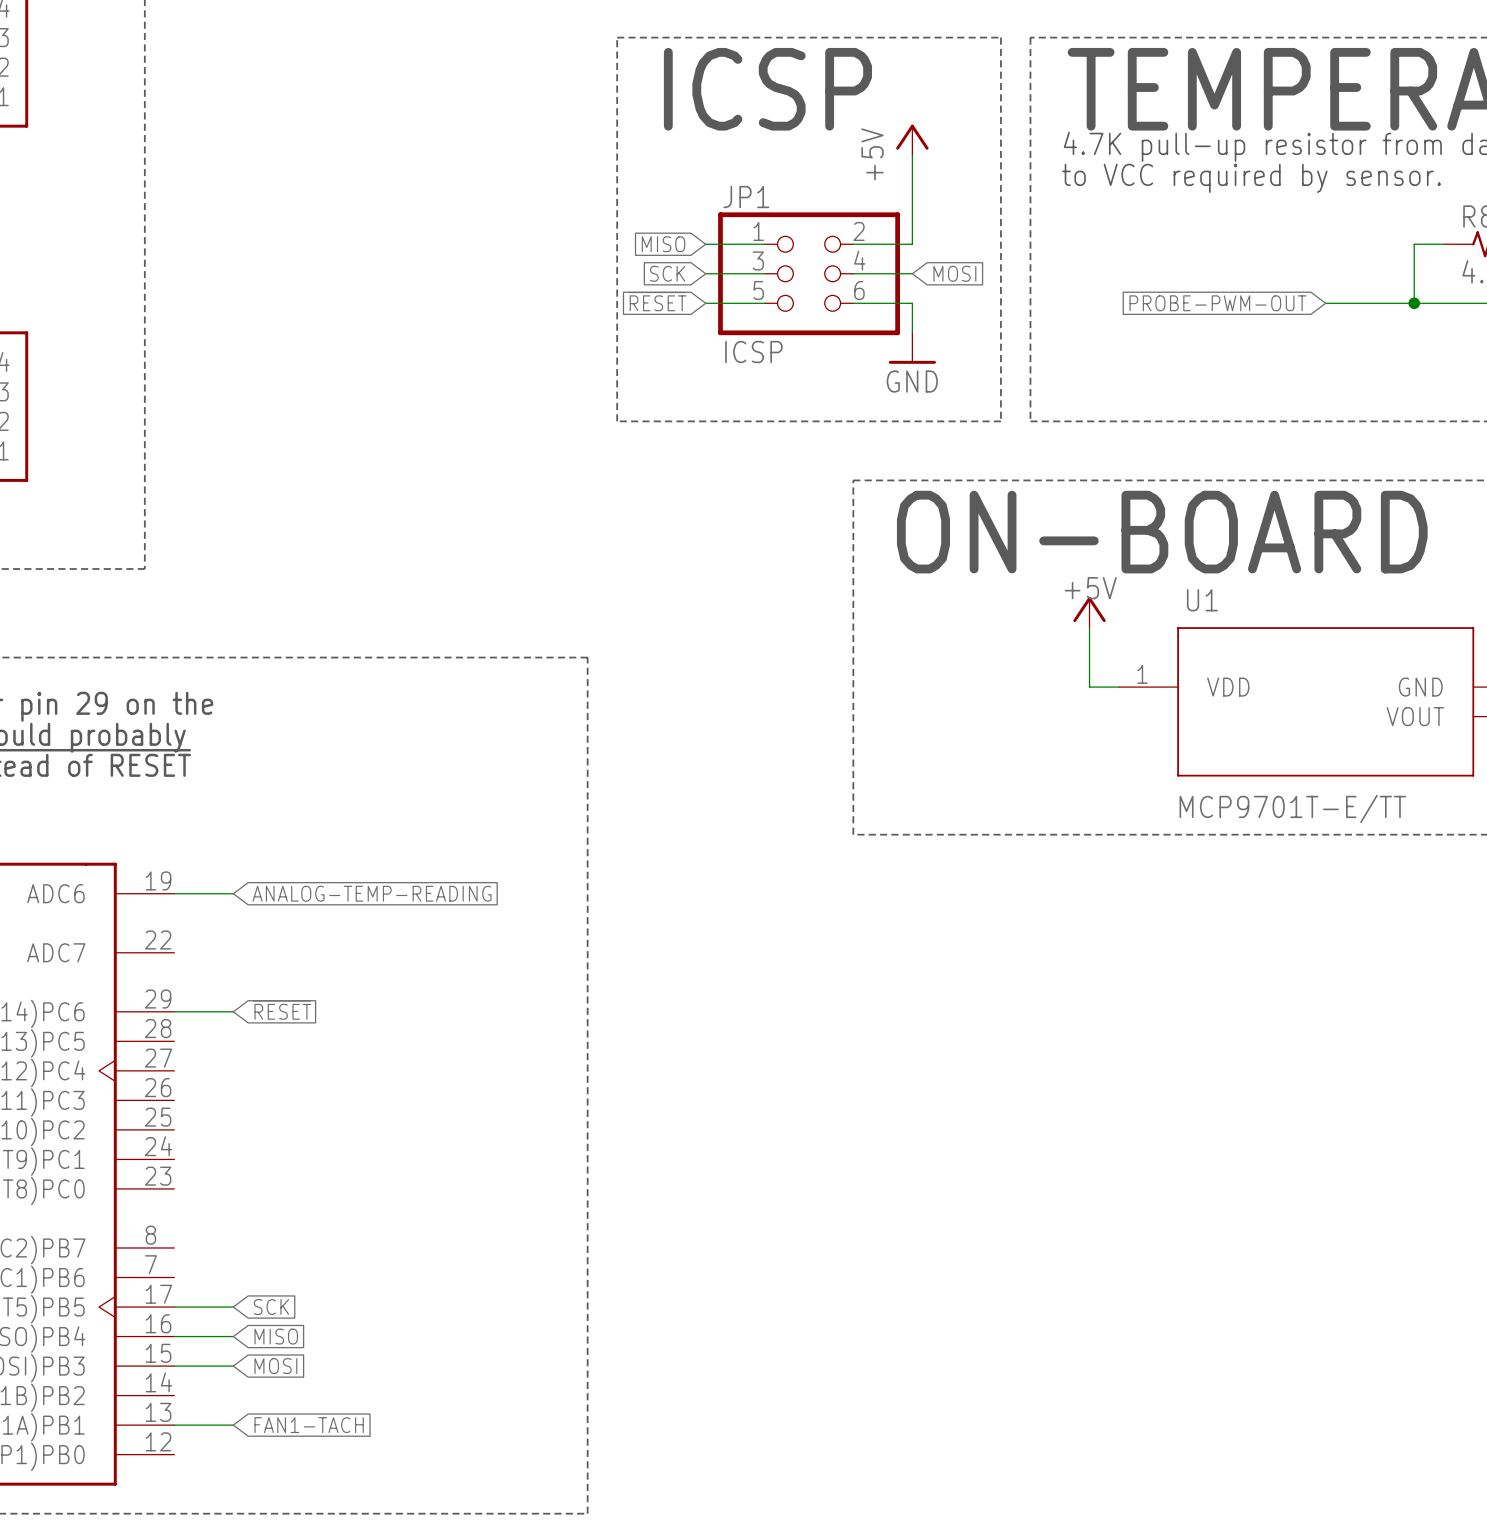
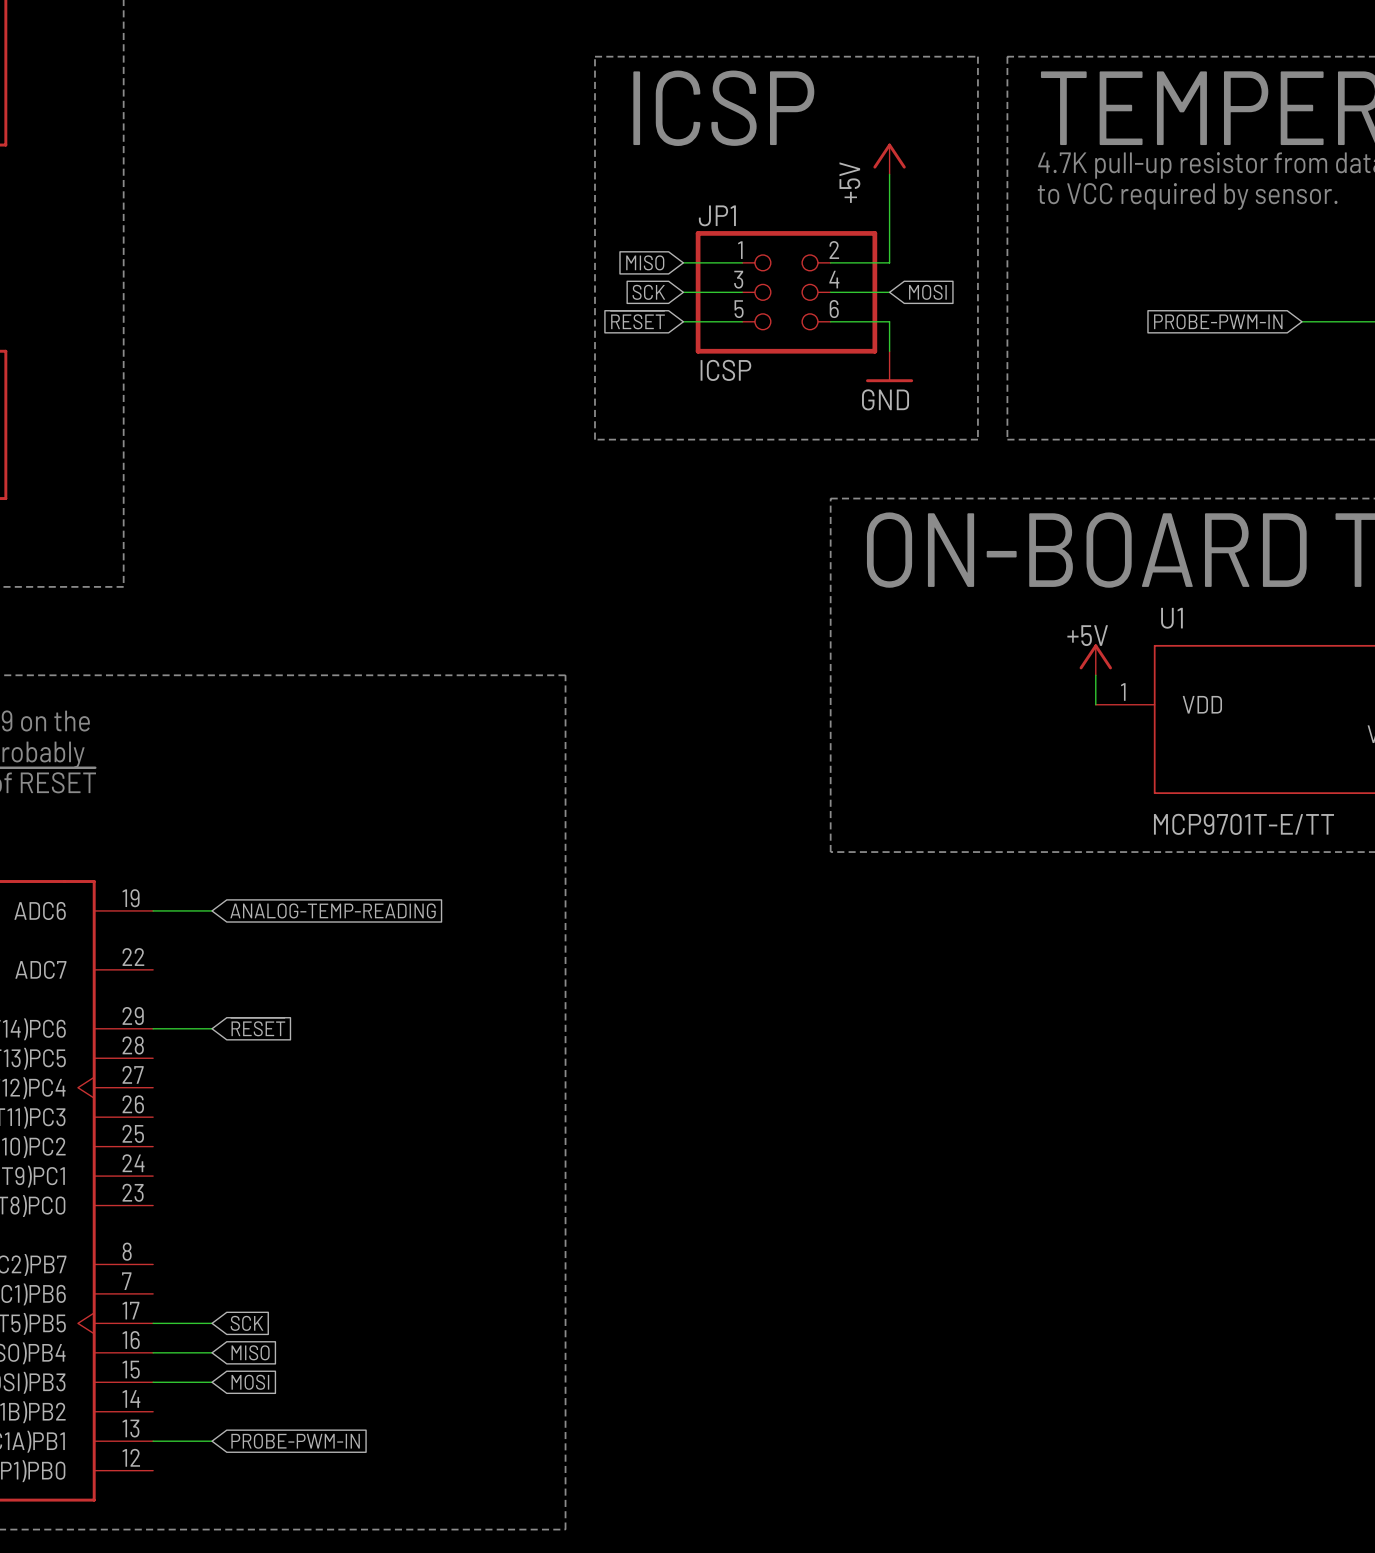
global label: PROBE-PWM-OUT (1217, 303) -> PROBE-PWM-IN (1218, 321)
power symbol position: +5V (1089, 612) -> +5V (1095, 659)
wire: (1089, 628) (1089, 687) (1119, 687) -> (1095, 675) (1095, 704)
global label: FAN1-TACH (309, 1425) -> PROBE-PWM-IN (295, 1441)

